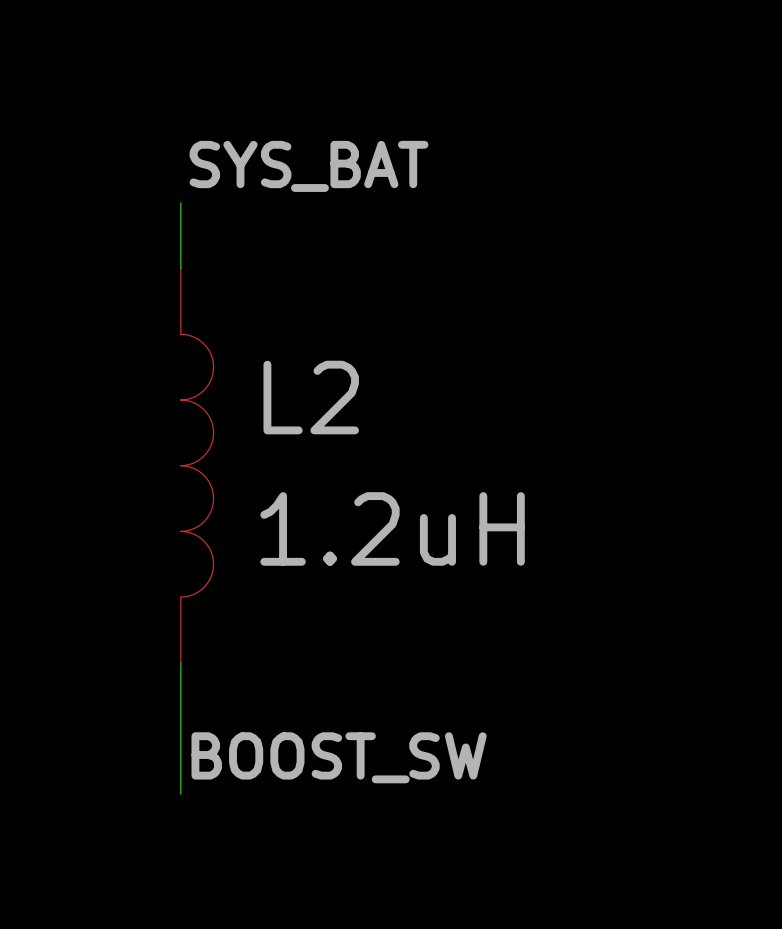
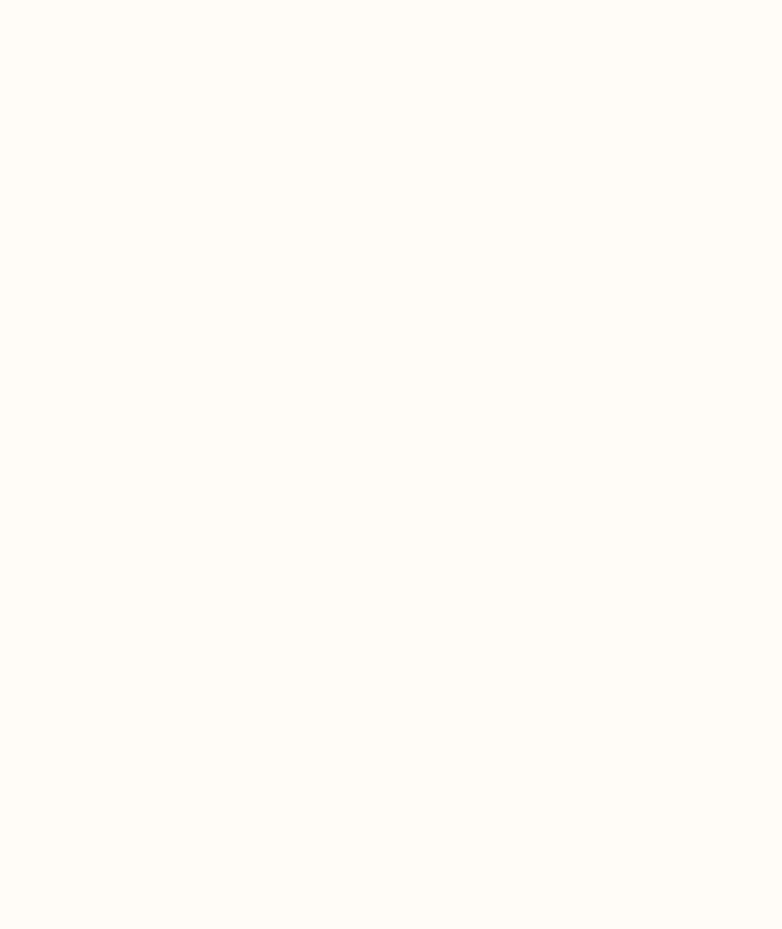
label: SYS_BAT (309, 166) -> none
wire: (180, 202) (180, 268) -> none
L2: 1.2uH (197, 465) -> none
wire: (180, 662) (180, 794) -> none
label: BOOST_SW (339, 757) -> none

